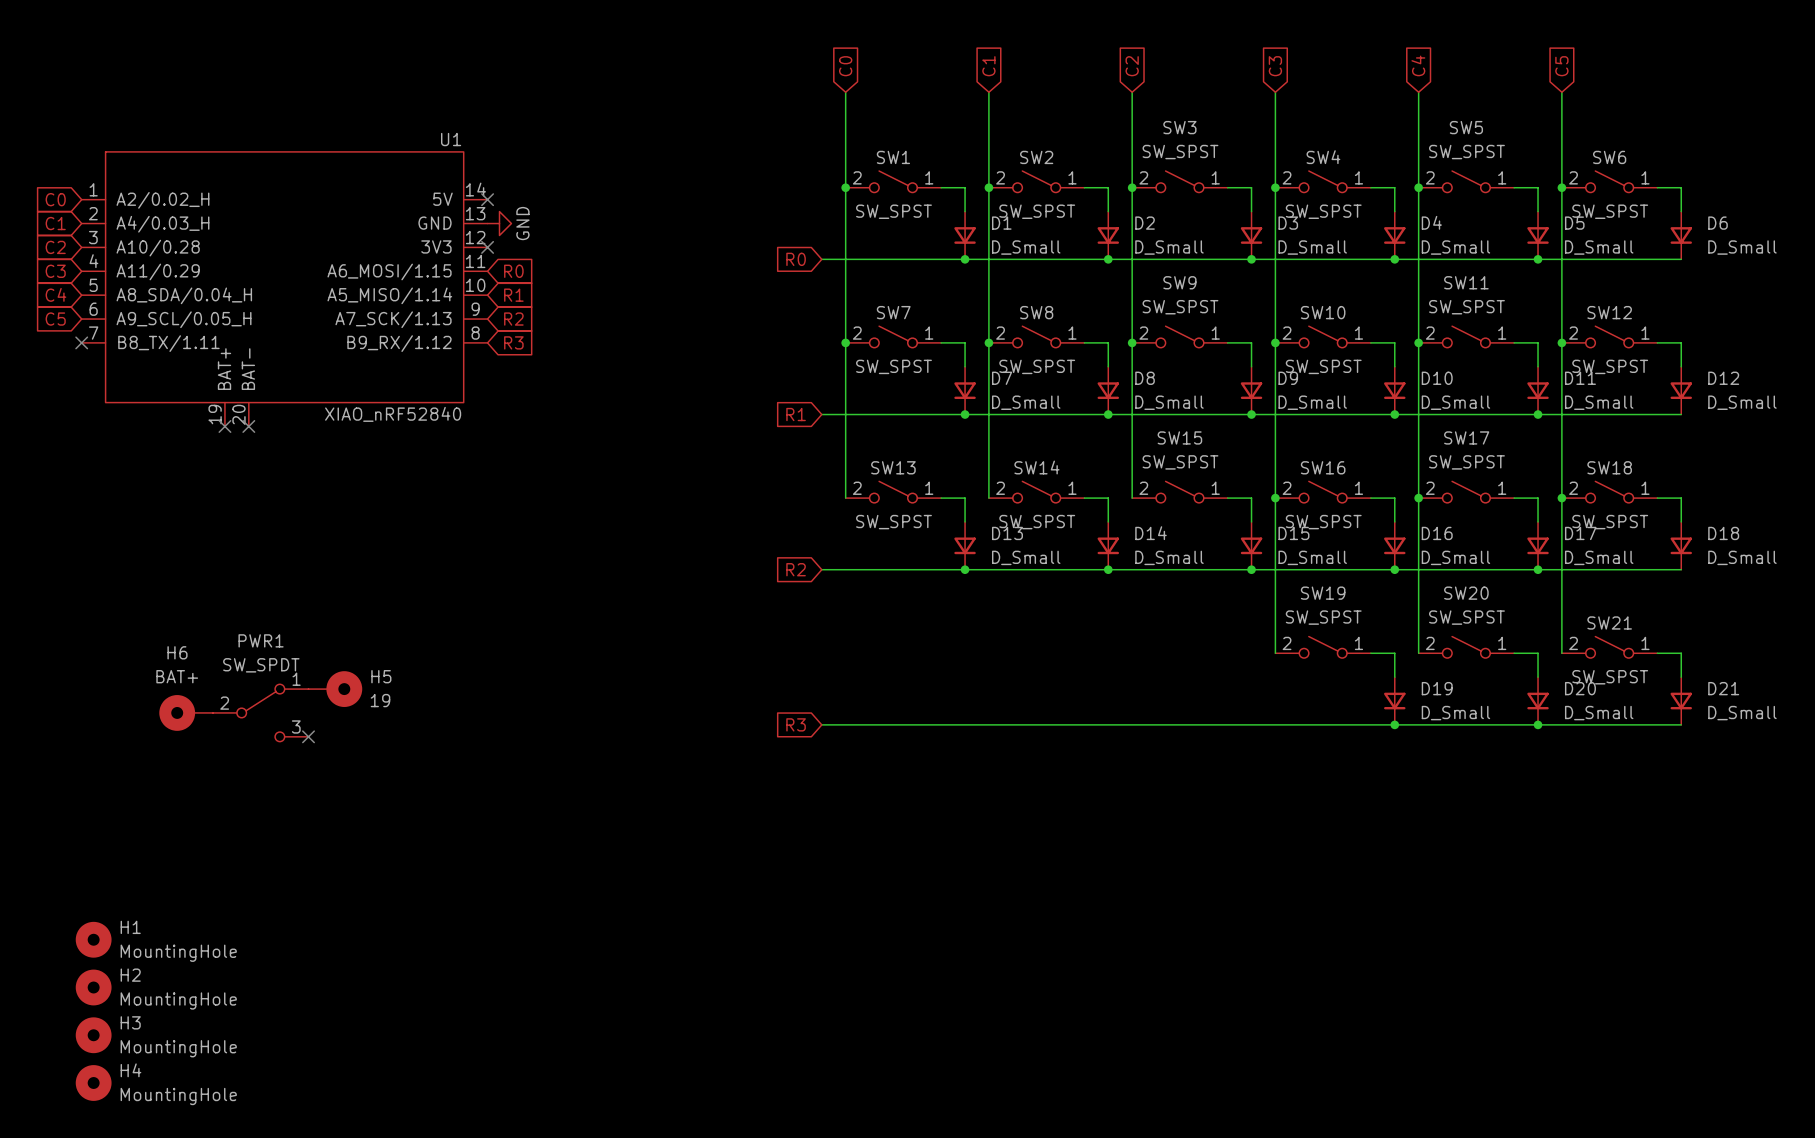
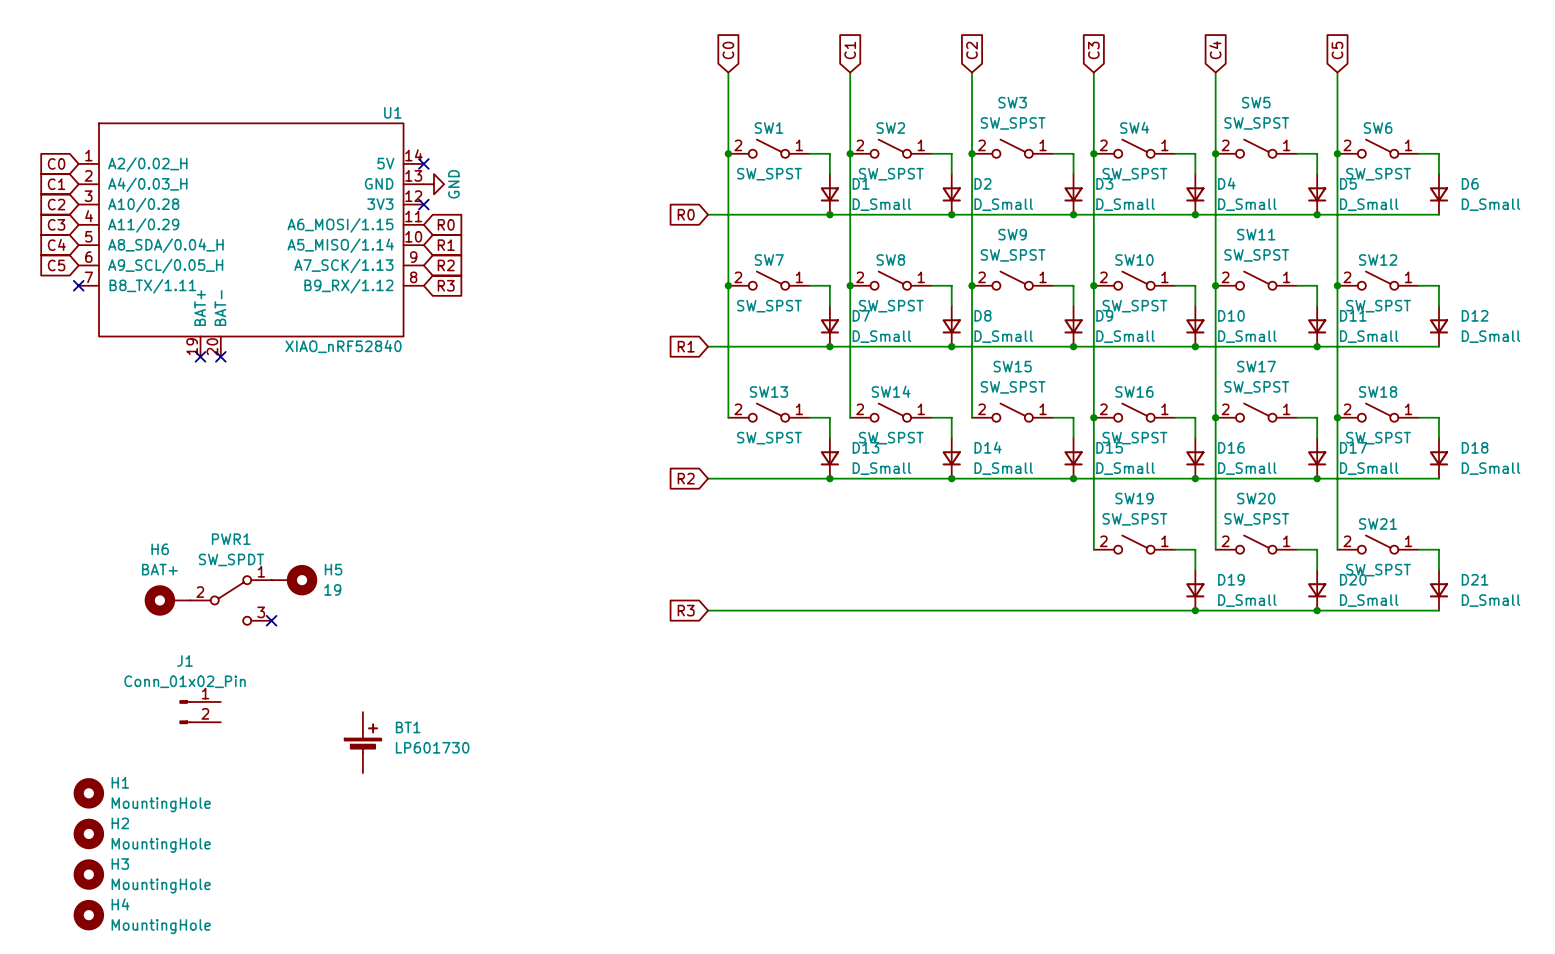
J1: none -> Conn_01x02_Pin (200, 712)
BT1: none -> LP601730 (362, 742)

